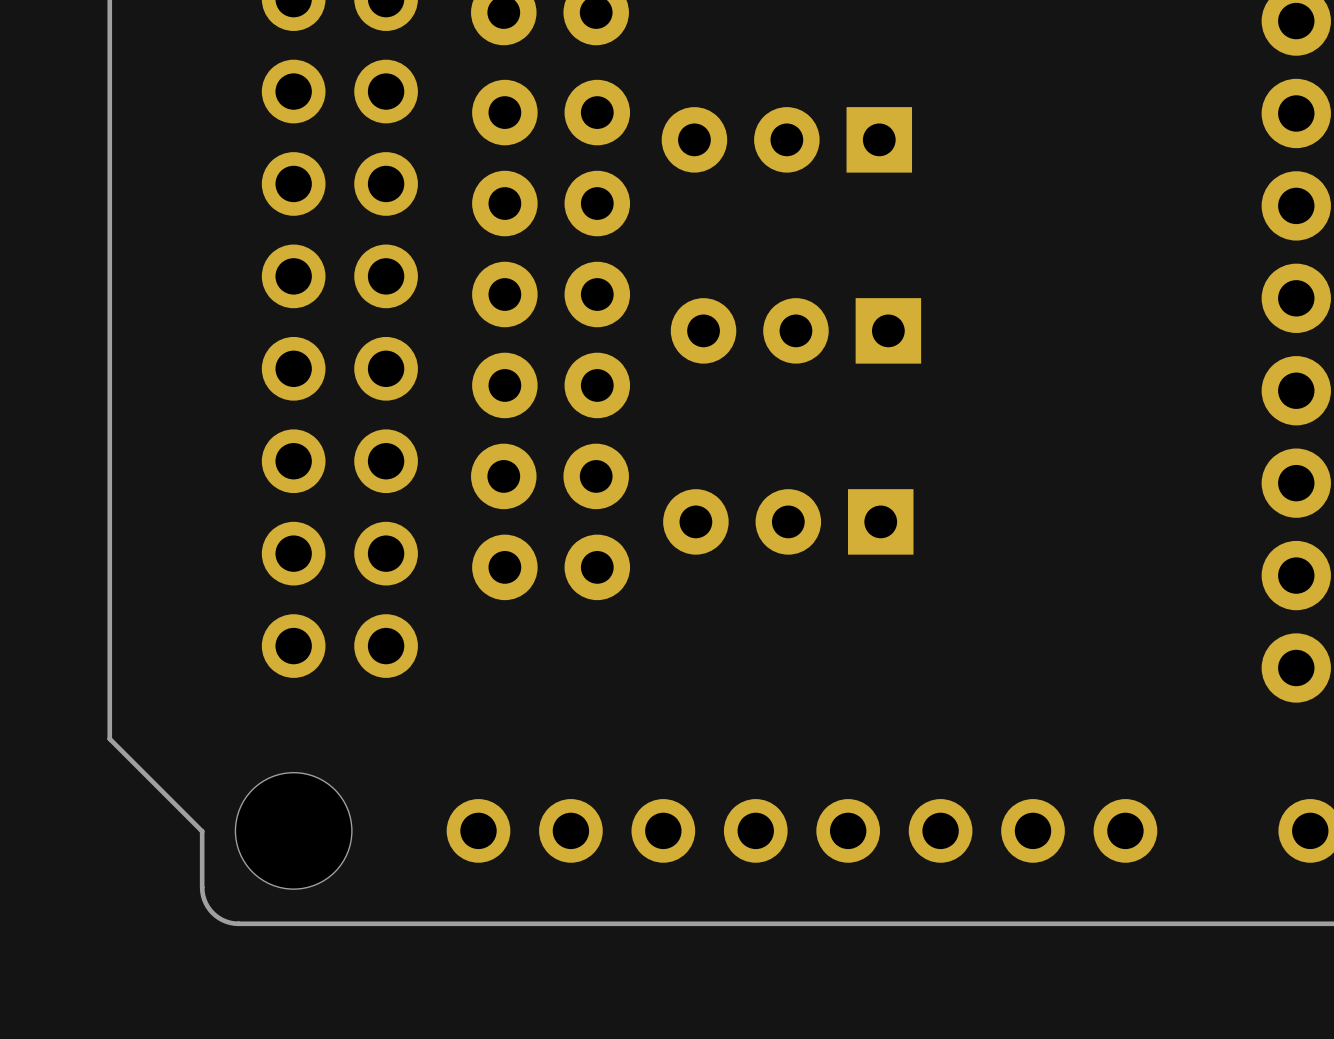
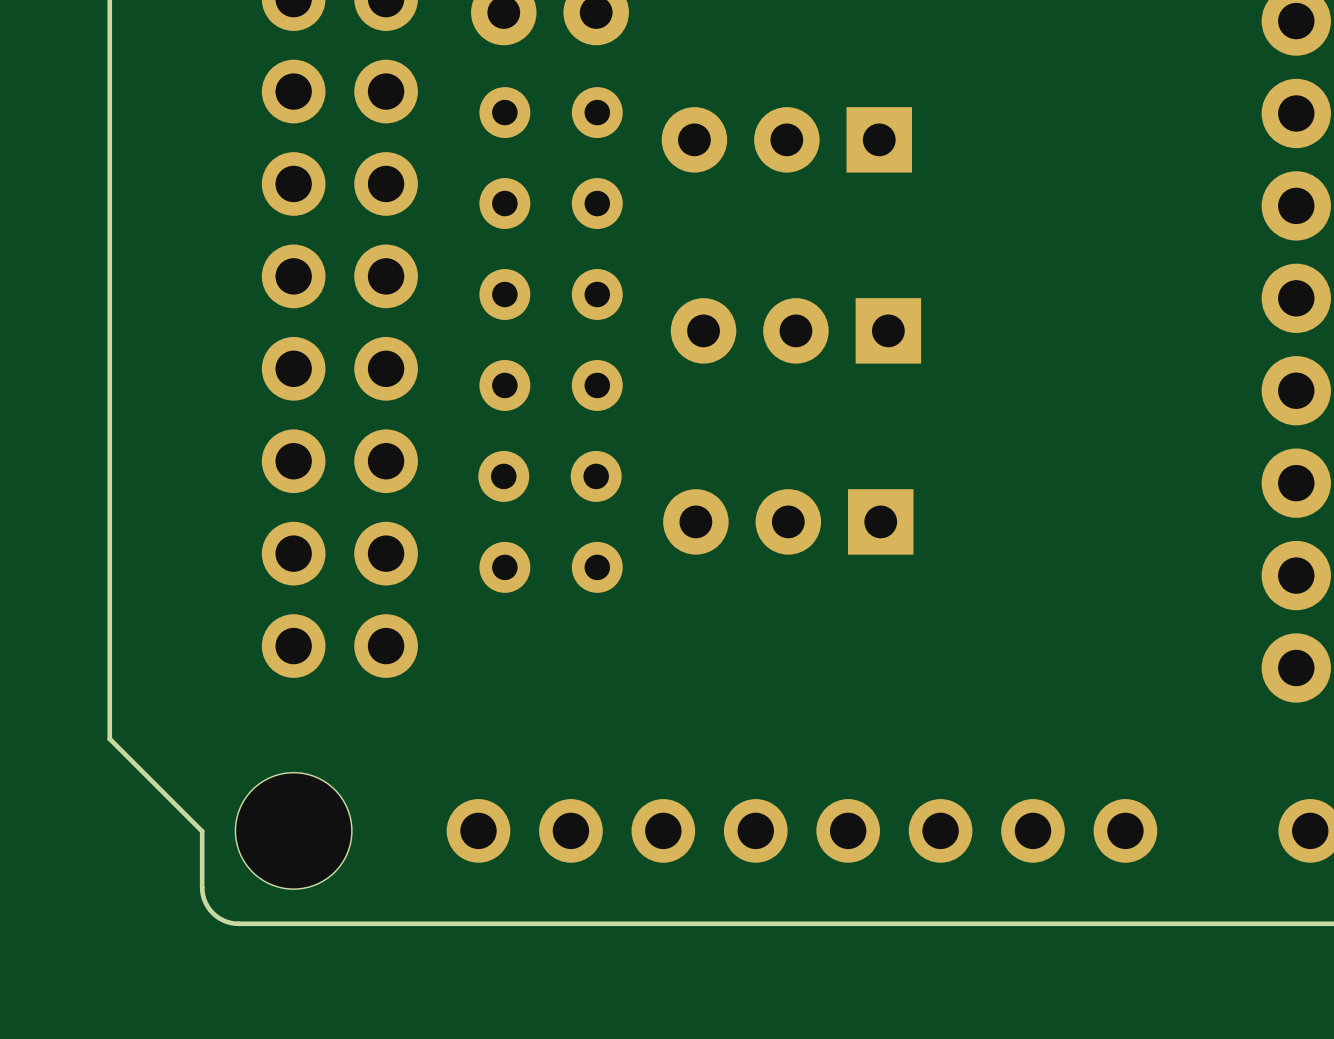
part footprint: [472, 79, 631, 146] -> [479, 87, 623, 139]
part footprint: [472, 170, 631, 237] -> [479, 178, 623, 230]
part footprint: [472, 261, 631, 328] -> [479, 269, 623, 320]
part footprint: [472, 352, 631, 419] -> [479, 359, 623, 411]
part footprint: [471, 443, 629, 510] -> [478, 450, 622, 502]
part footprint: [472, 534, 631, 601] -> [479, 541, 623, 593]

